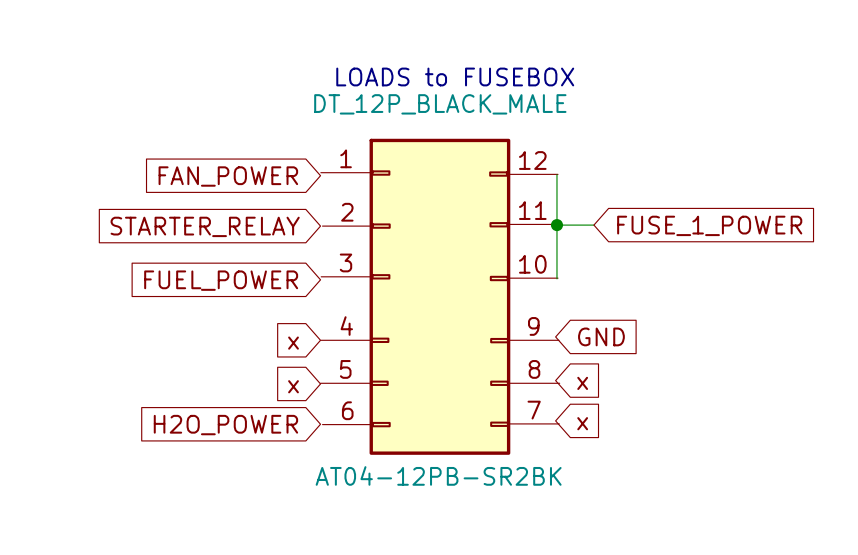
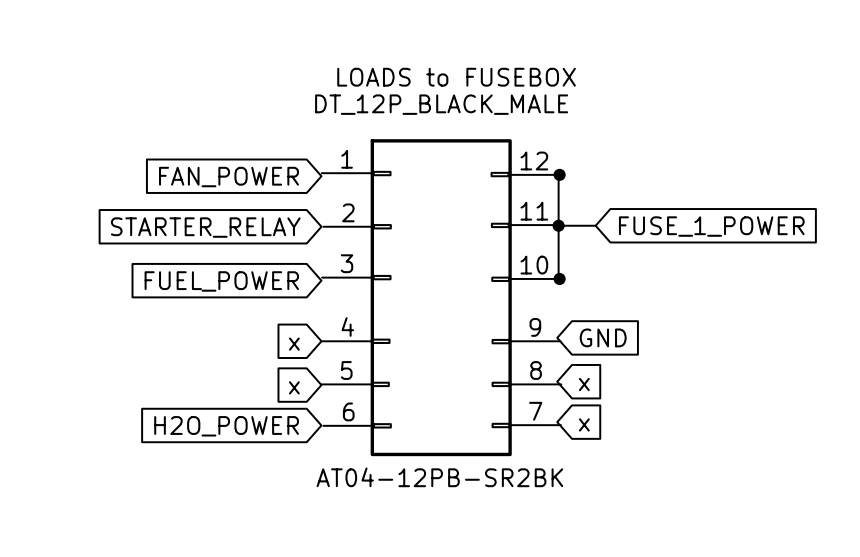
junction: none -> (559, 174)
junction: none -> (559, 278)

